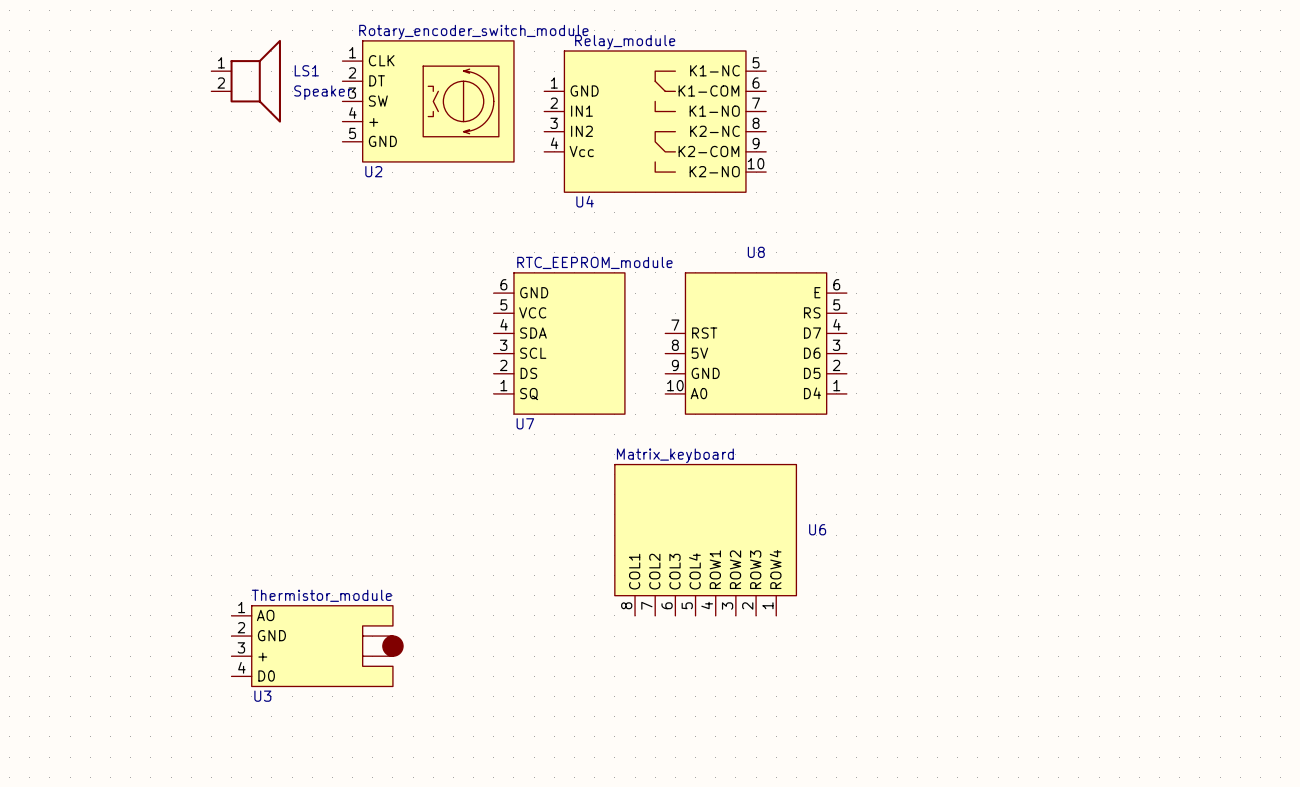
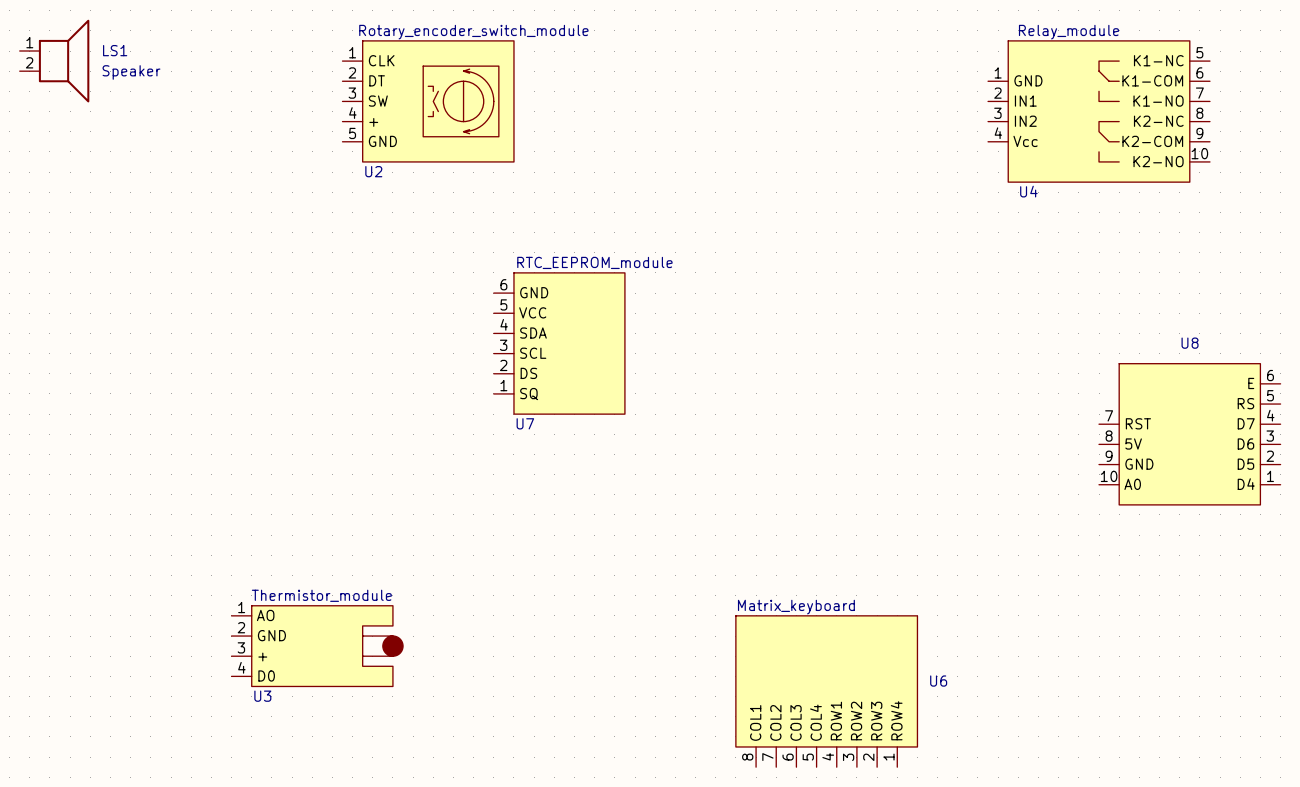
LS1 position: (246, 81) -> (54, 61)
U4 position: (655, 121) -> (1099, 111)
U8 position: (756, 343) -> (1189, 434)
U6 position: (705, 540) -> (826, 691)

